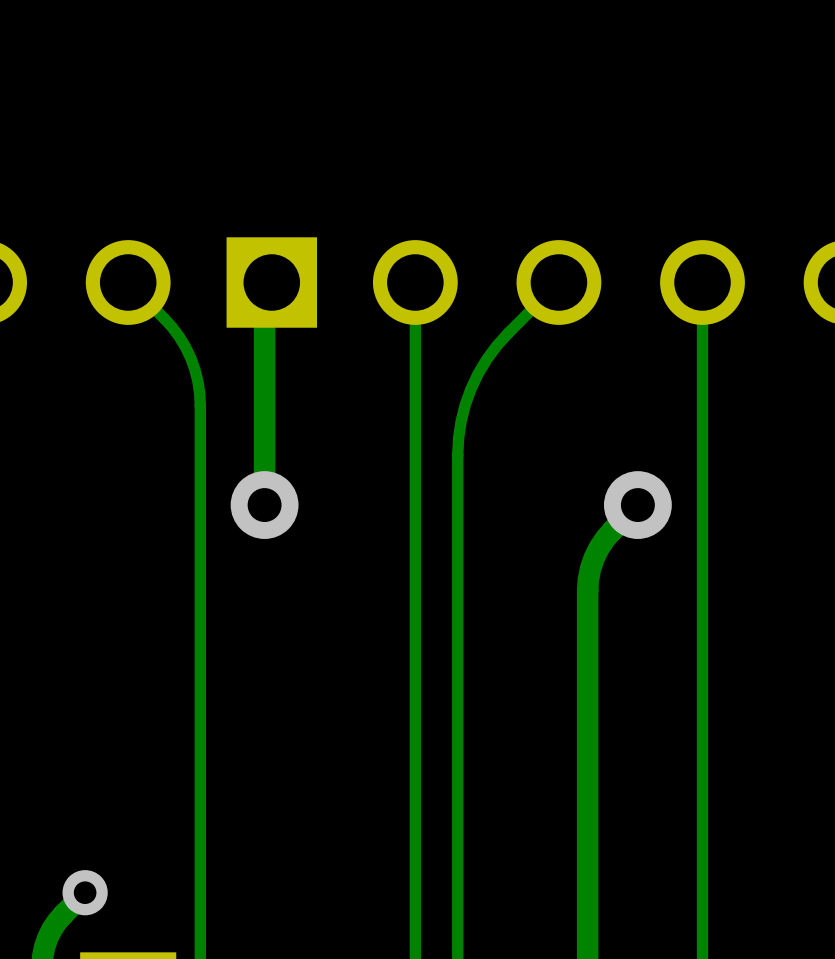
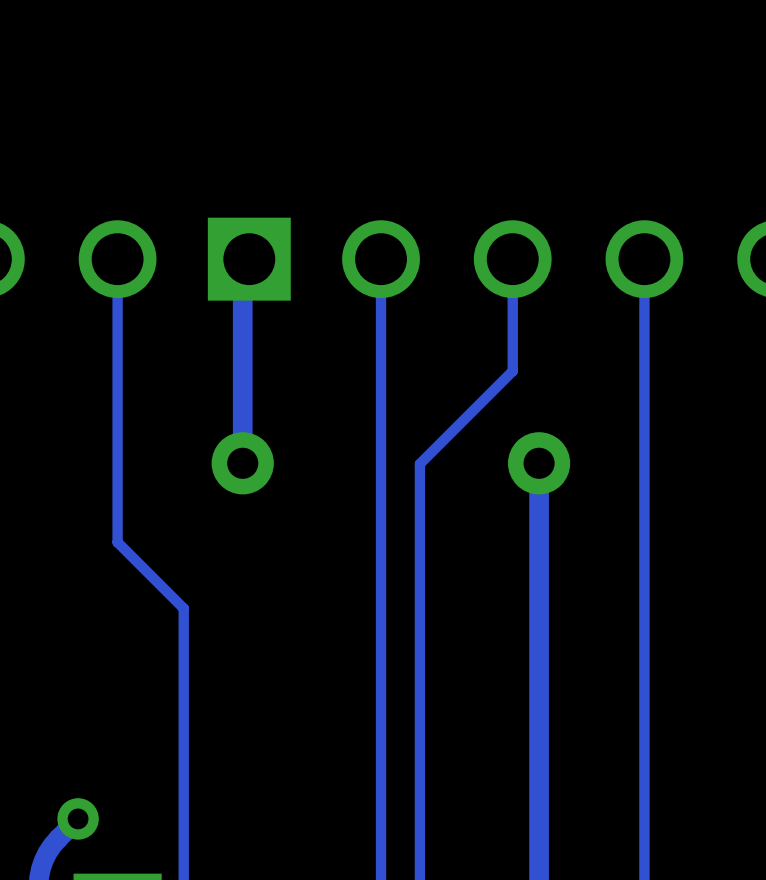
track: (128, 282) (164, 318) (179, 337) (190, 358) (197, 381) (200, 405) (200, 663) -> (117, 259) (117, 542) (183, 608)
track: (558, 282) (496, 345) (486, 359) (470, 389) (461, 421) (458, 438) (457, 505) -> (512, 259) (512, 371) (419, 463)
track: (637, 505) (612, 530) (599, 547) (590, 568) (587, 590) -> (539, 463) (539, 542)
via position: (637, 505) -> (539, 463)

